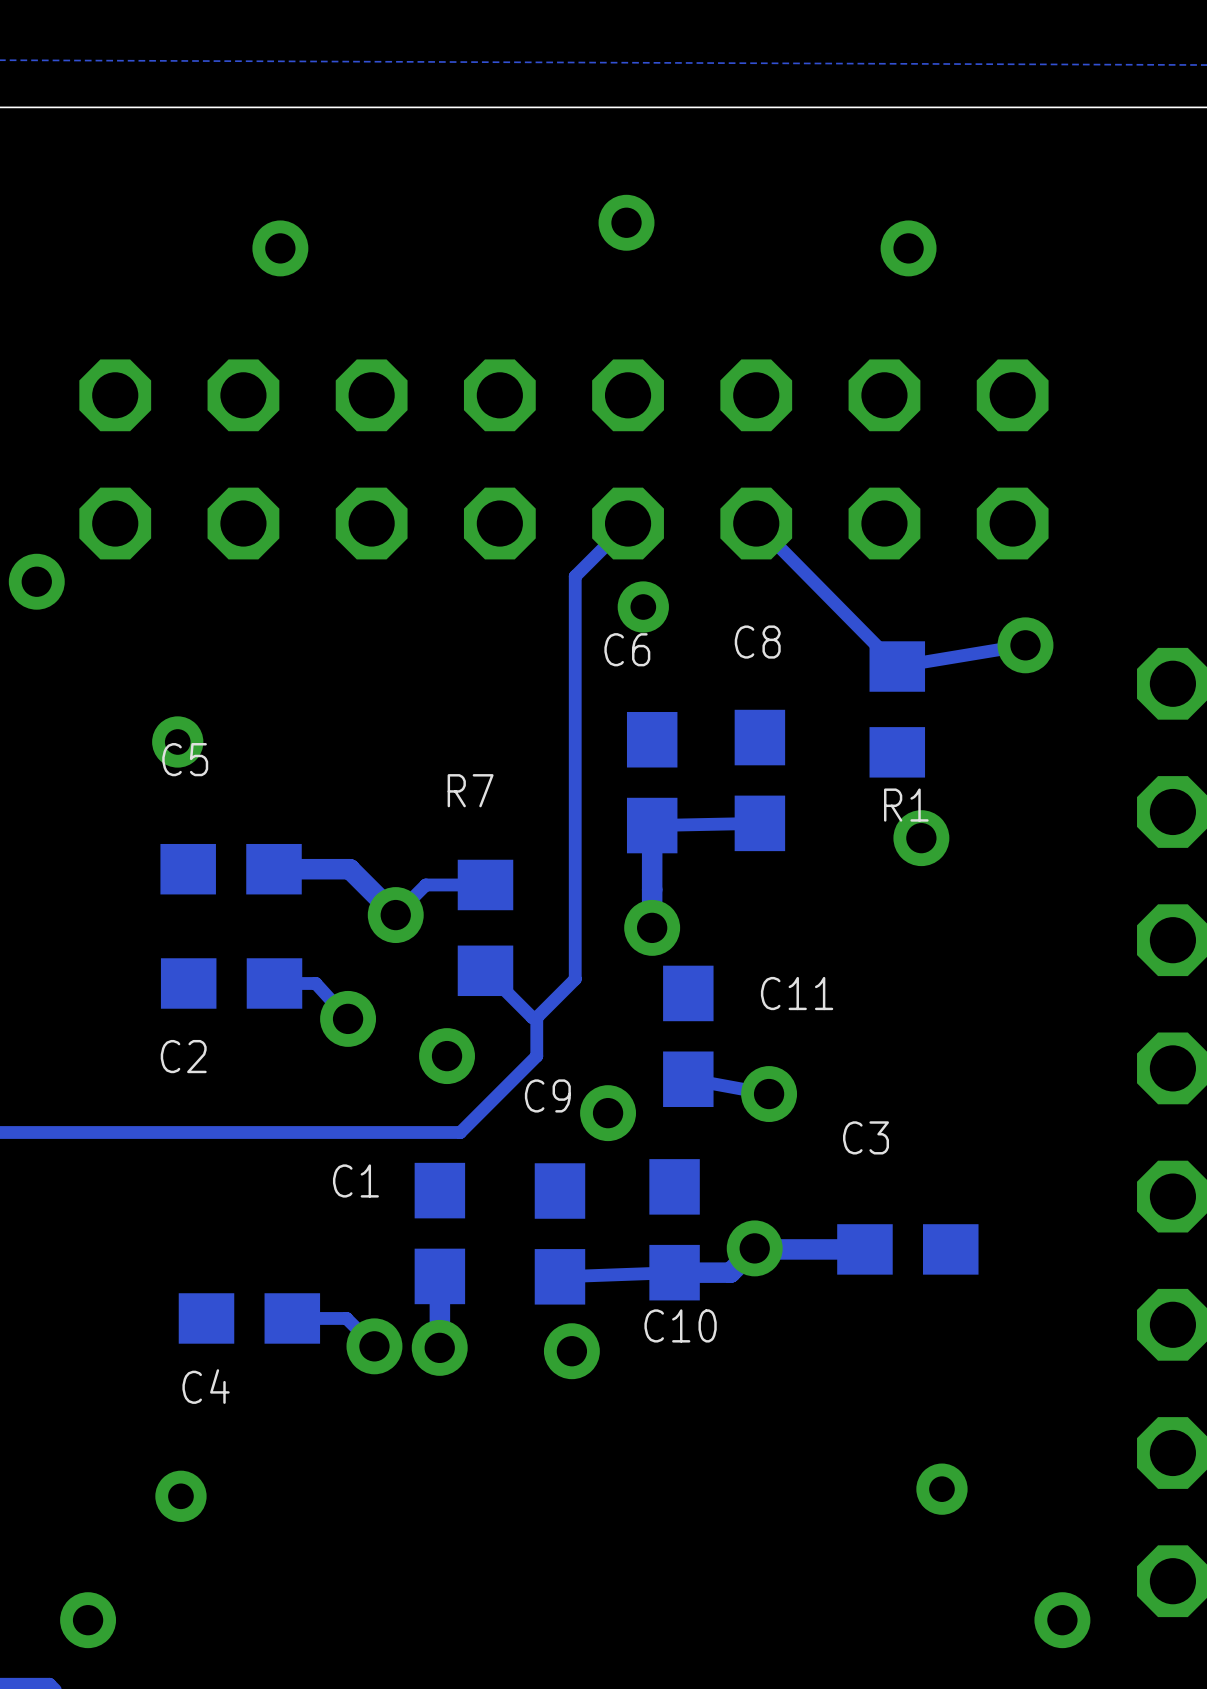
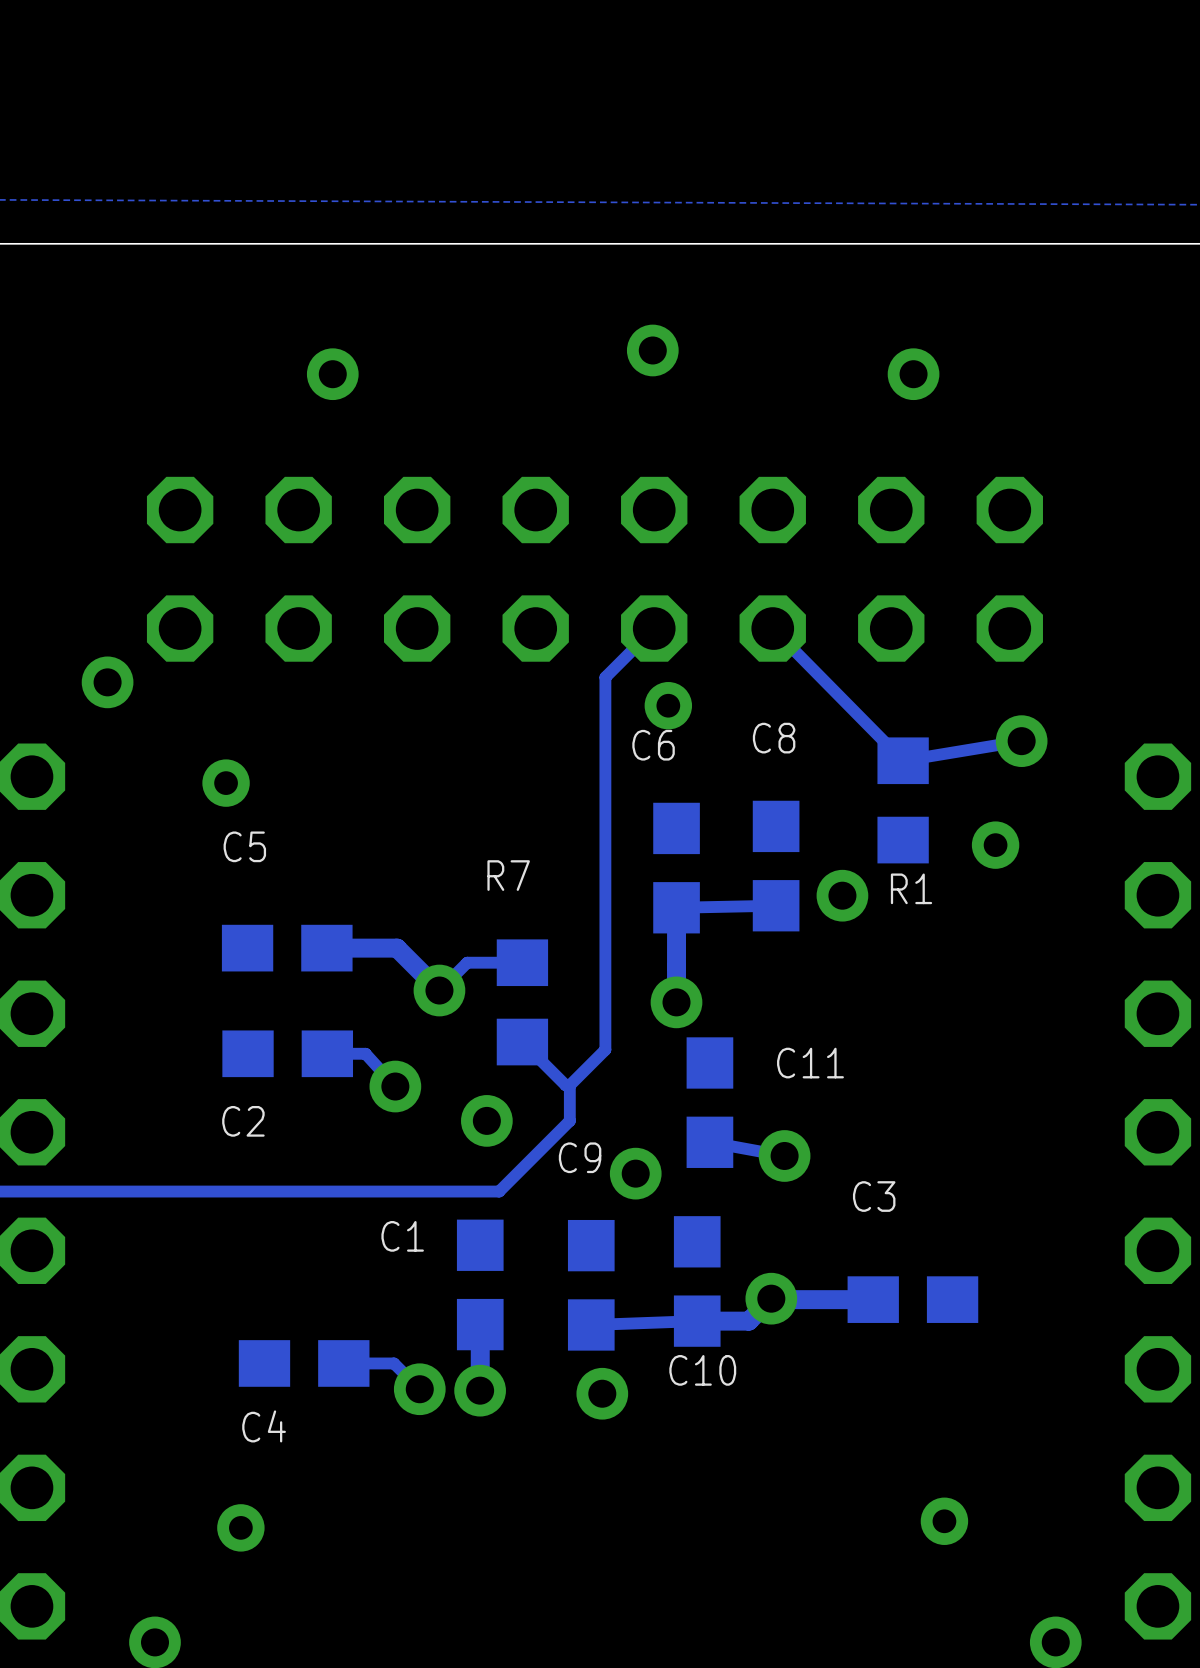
via position: (177, 741) -> (226, 783)
via: none -> (995, 845)
via position: (921, 838) -> (842, 895)

